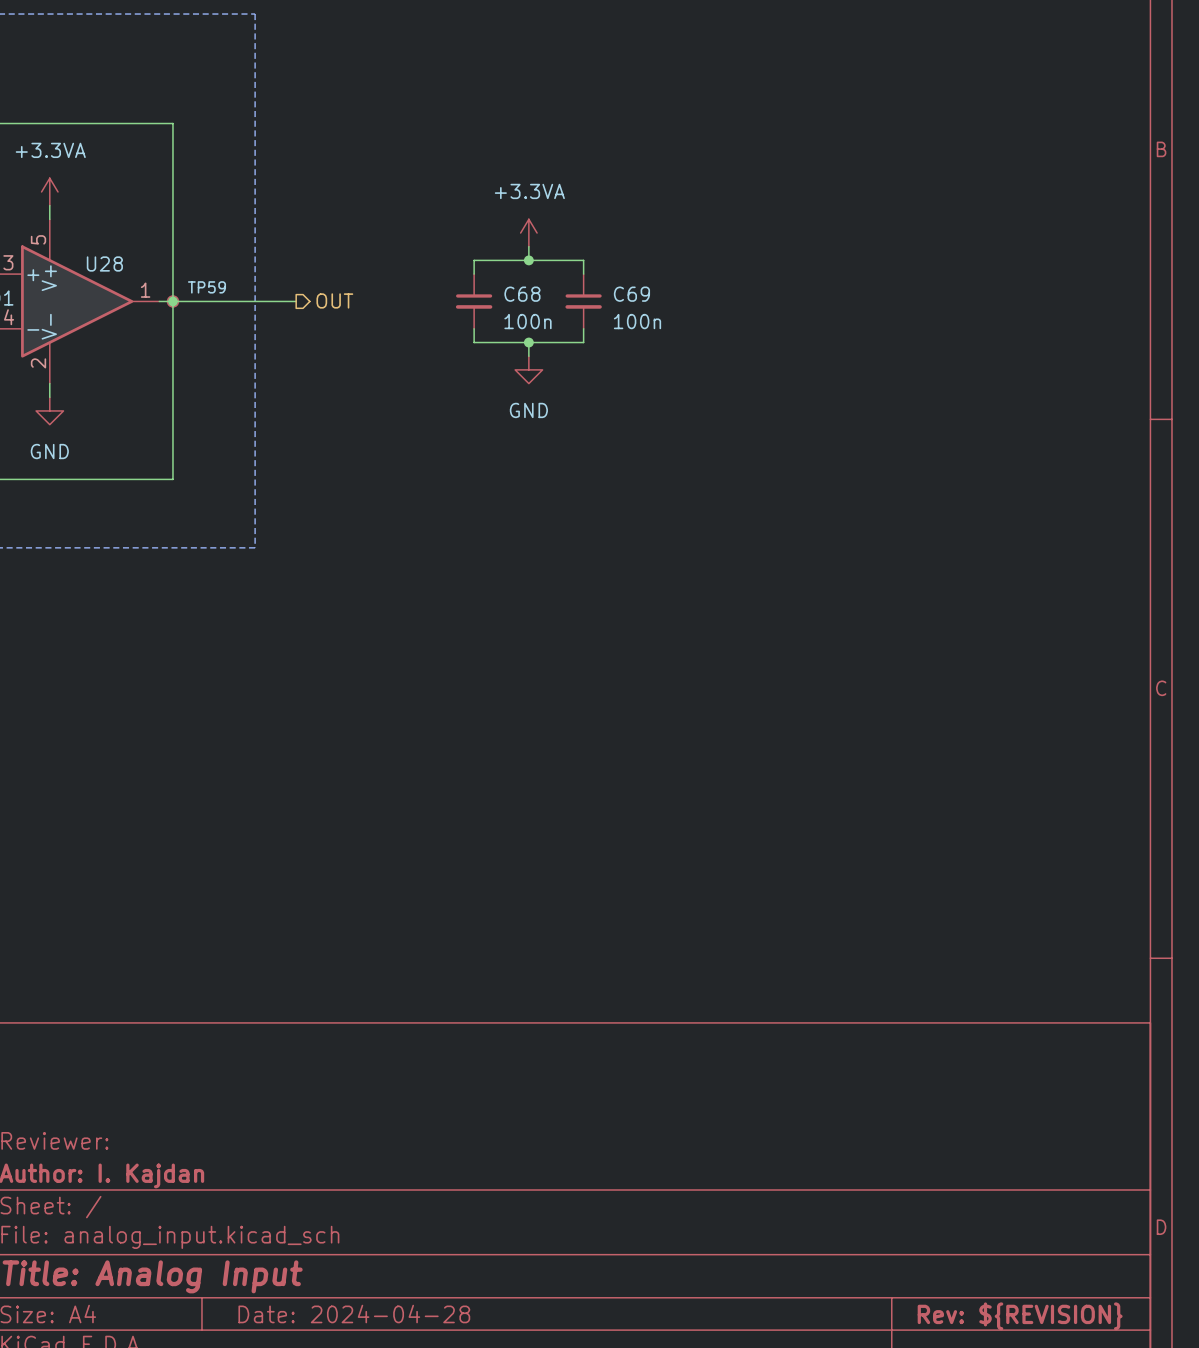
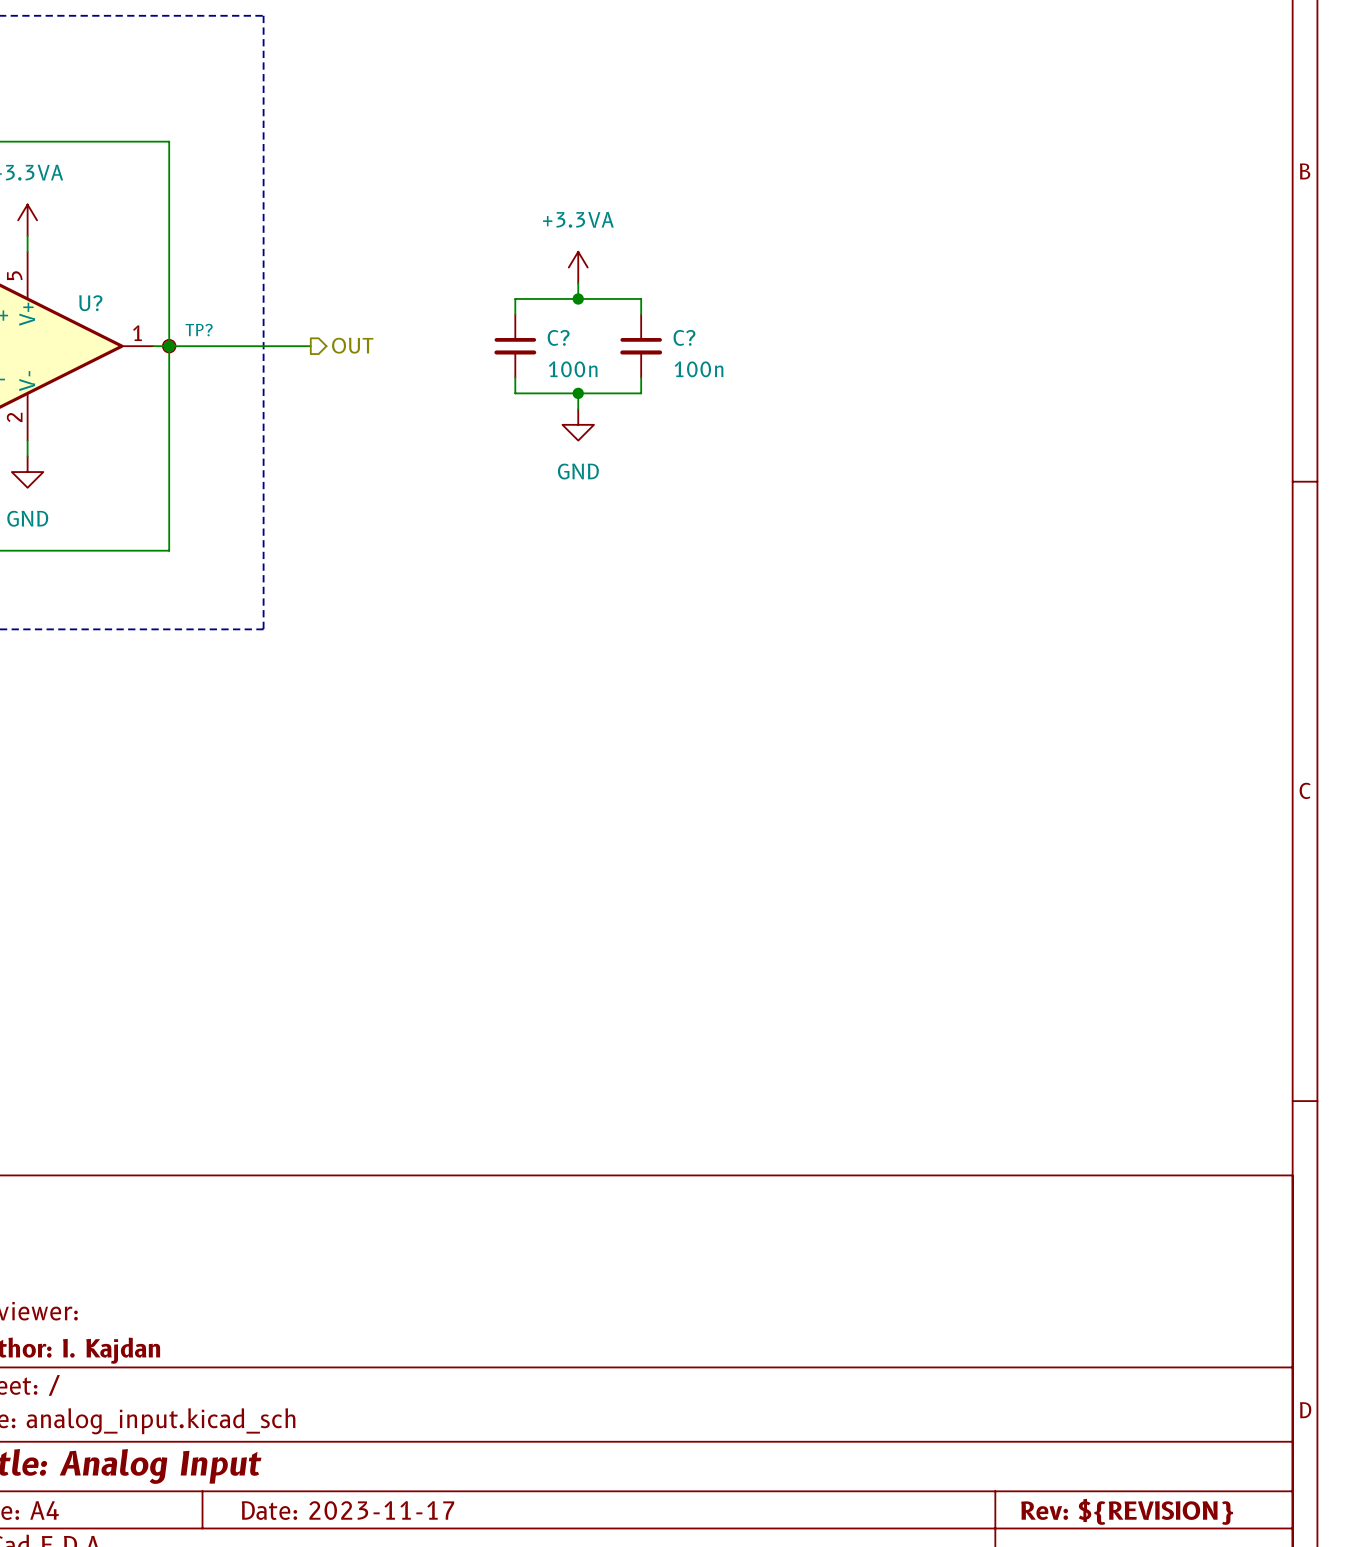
U28 name: U28 (104, 263) -> U? (90, 303)
TP59 name: TP59 (207, 287) -> TP? (199, 330)
C68 name: C68 (522, 294) -> C? (558, 337)
C69 name: C69 (631, 294) -> C? (684, 337)
title block: Date: 2024-04-28 (354, 1314) -> Date: 2023-11-17 (347, 1510)

